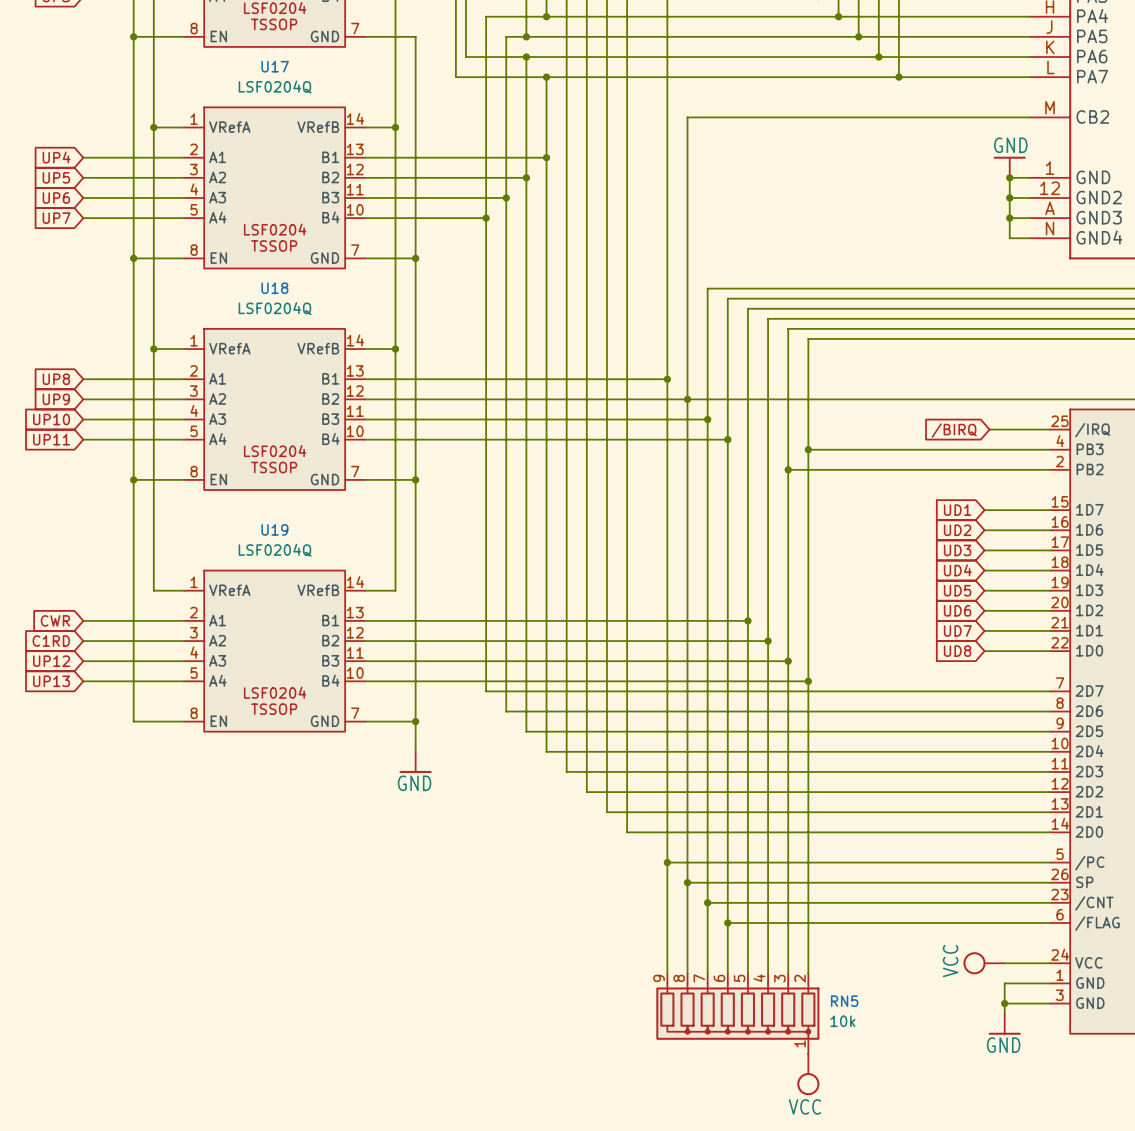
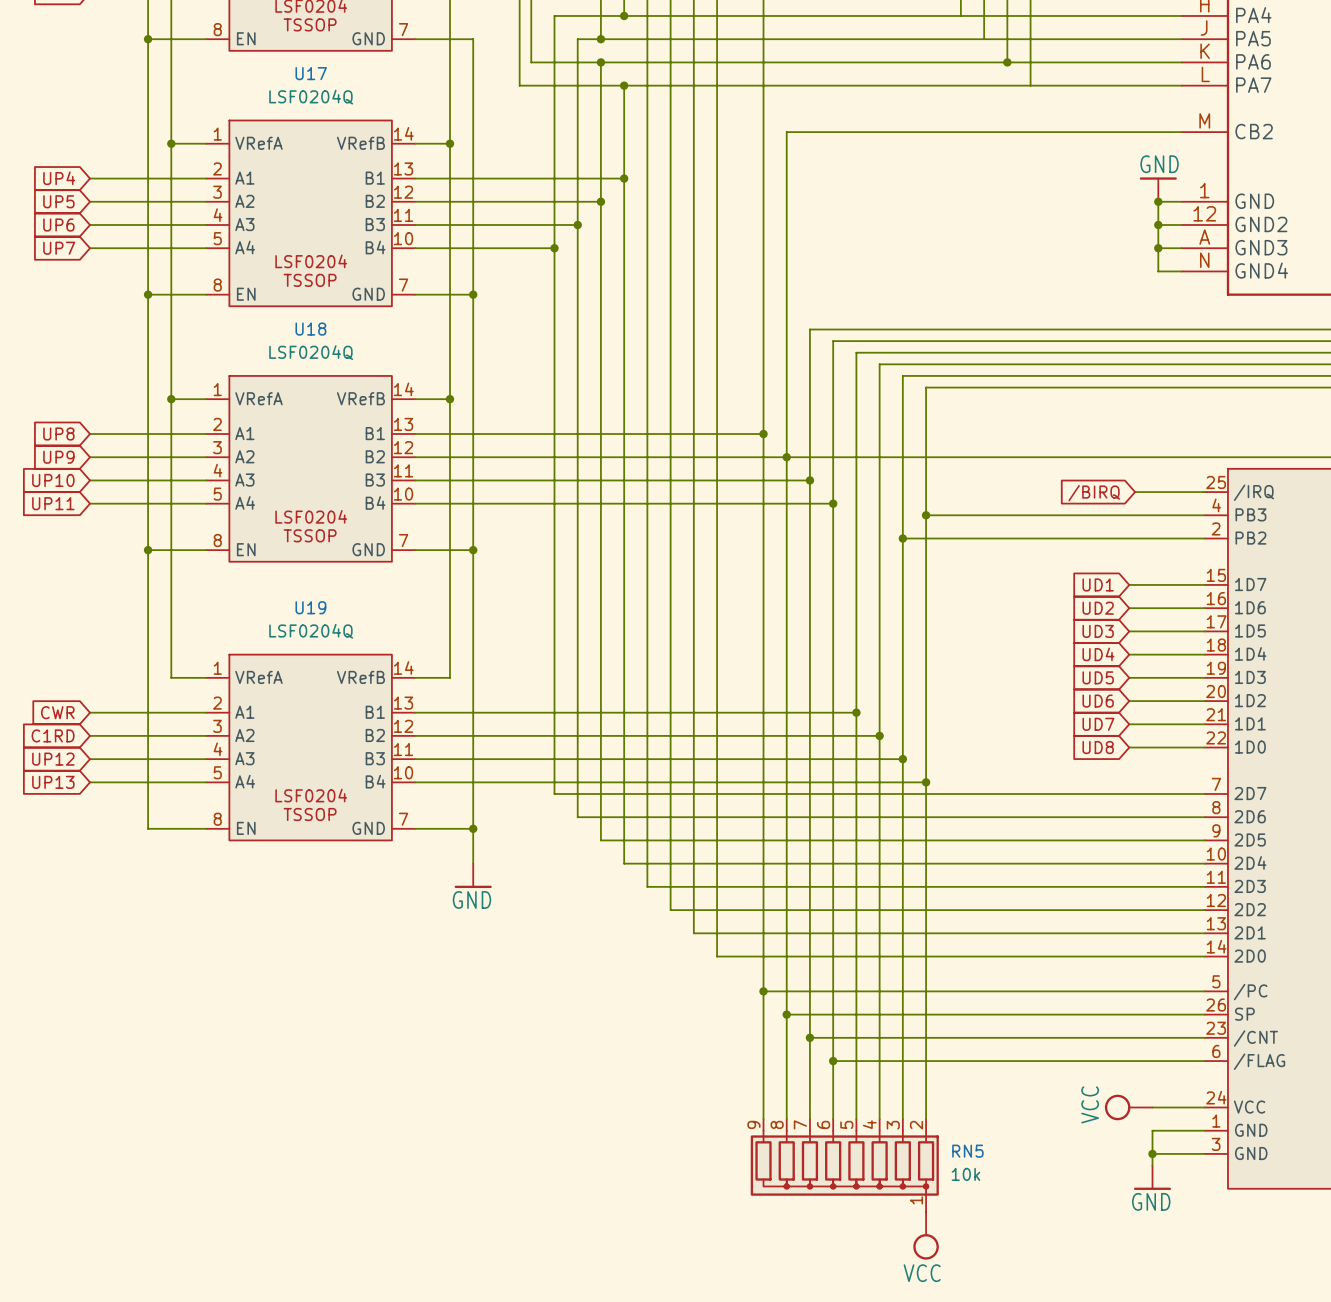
junction: (838, 16) -> none
junction: (858, 36) -> none
junction: (898, 77) -> none

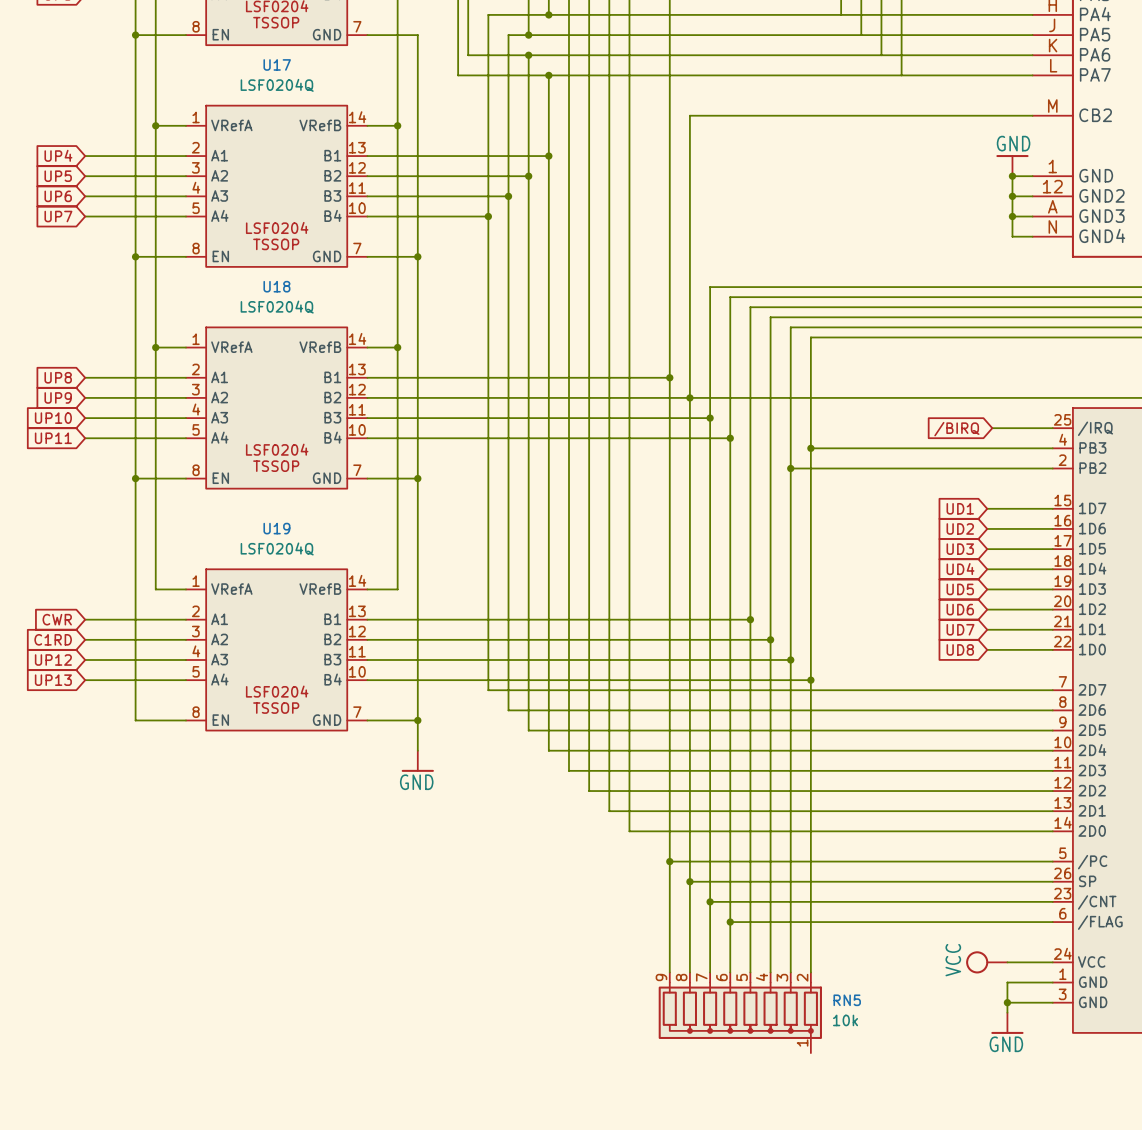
junction: (1007, 62) -> none
power symbol: VCC (926, 1235) -> none

